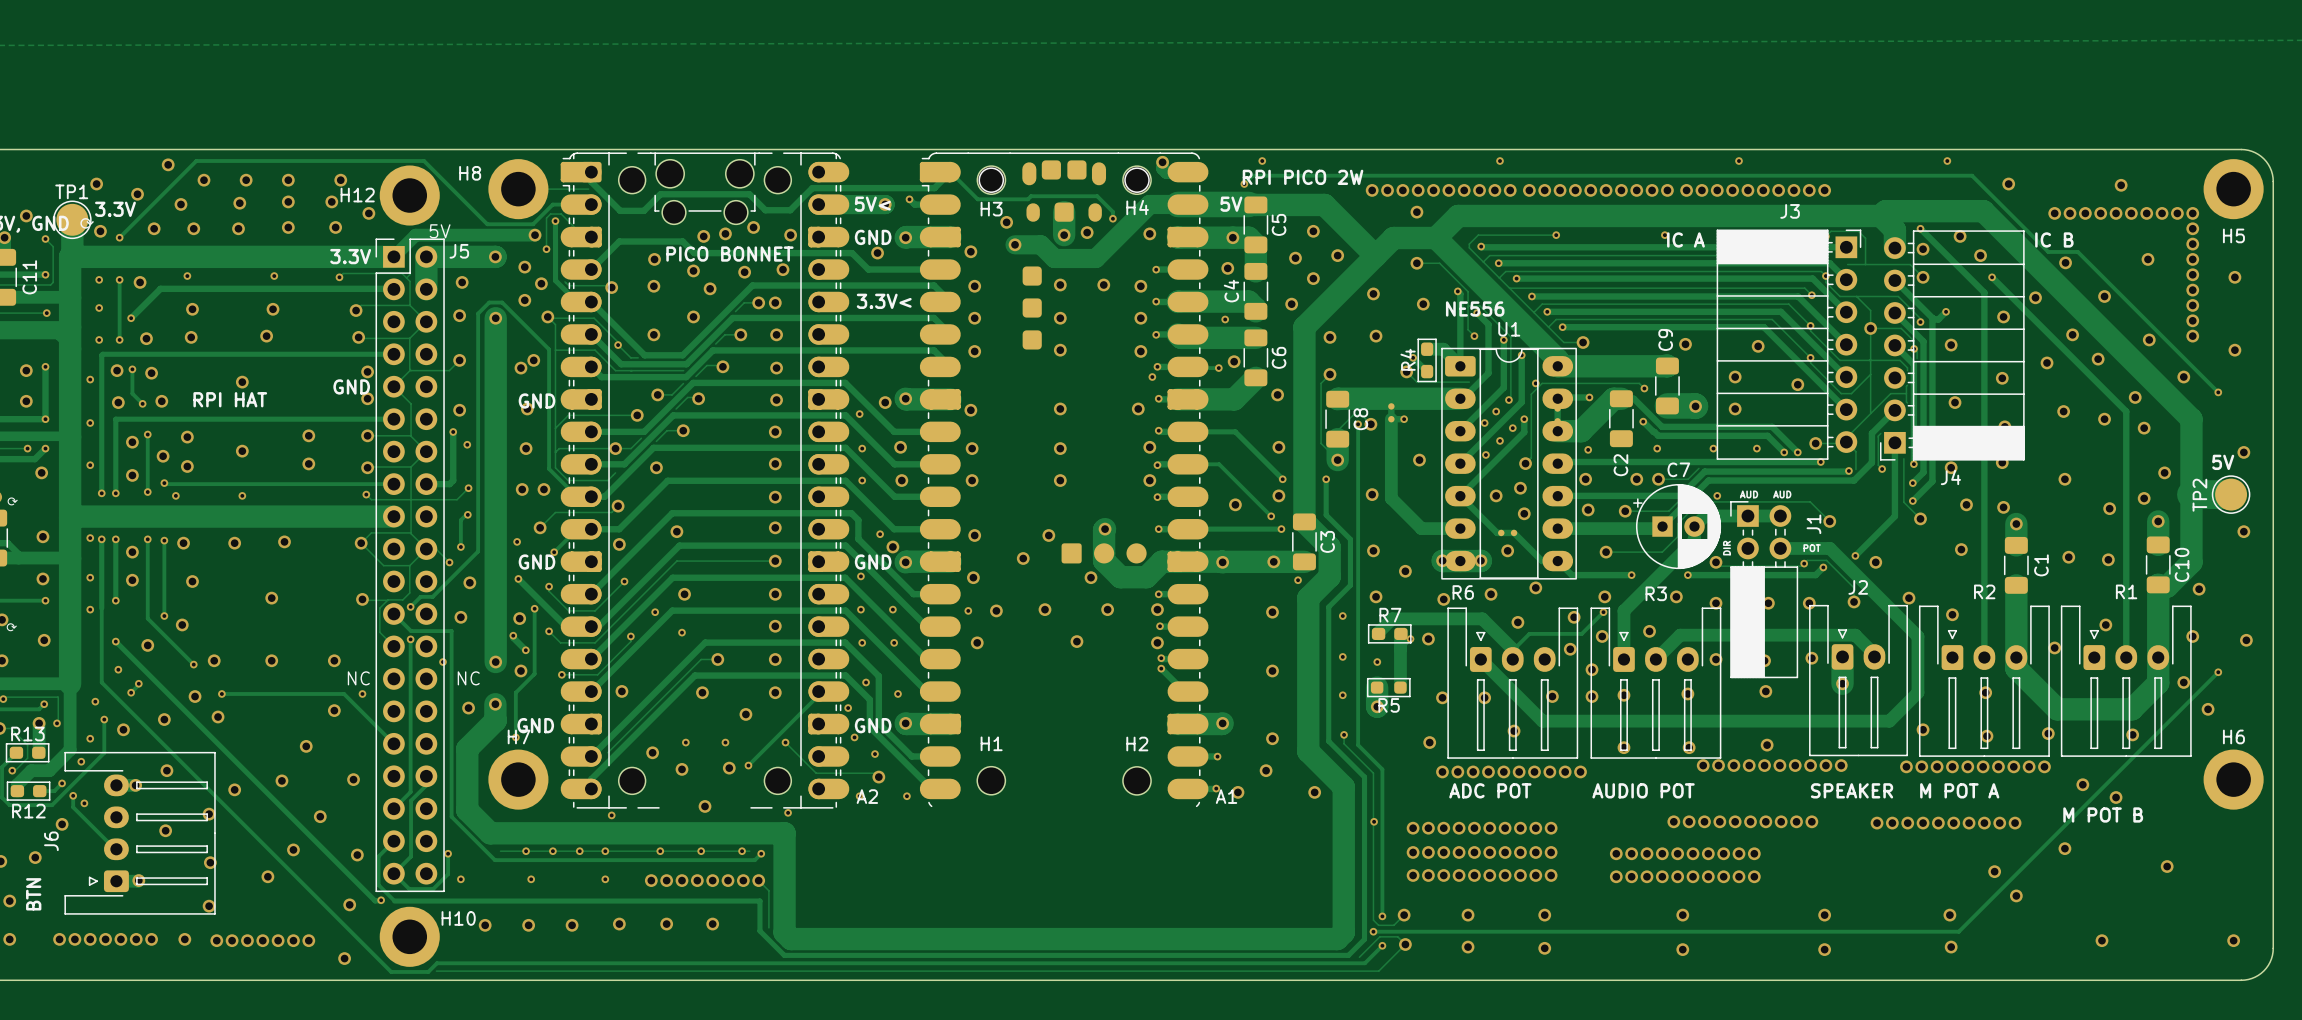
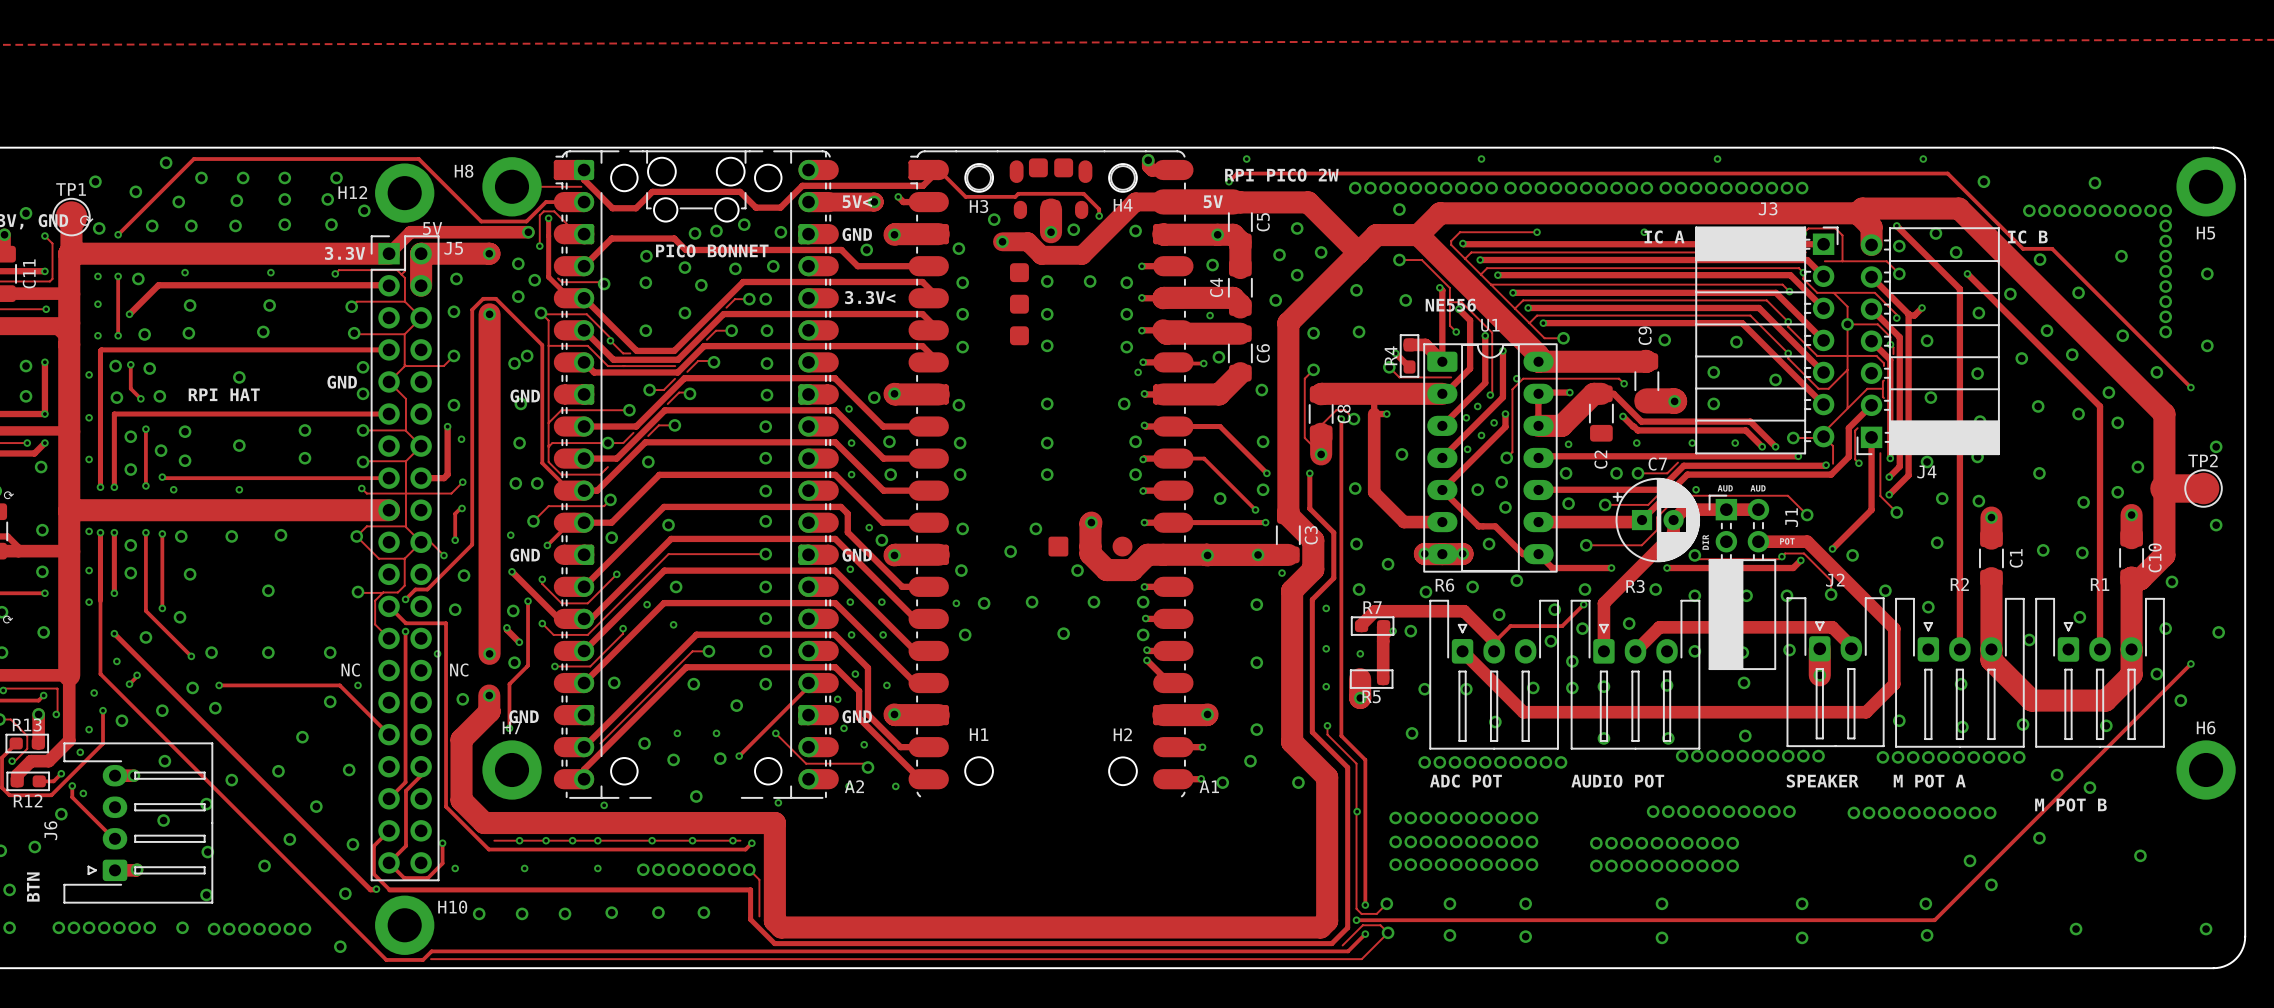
text: 3.3V (115, 209) -> none
text: 5V (2223, 462) -> none
TP2 name rotation: 0° (2199, 495) -> 90° clockwise (2203, 460)

